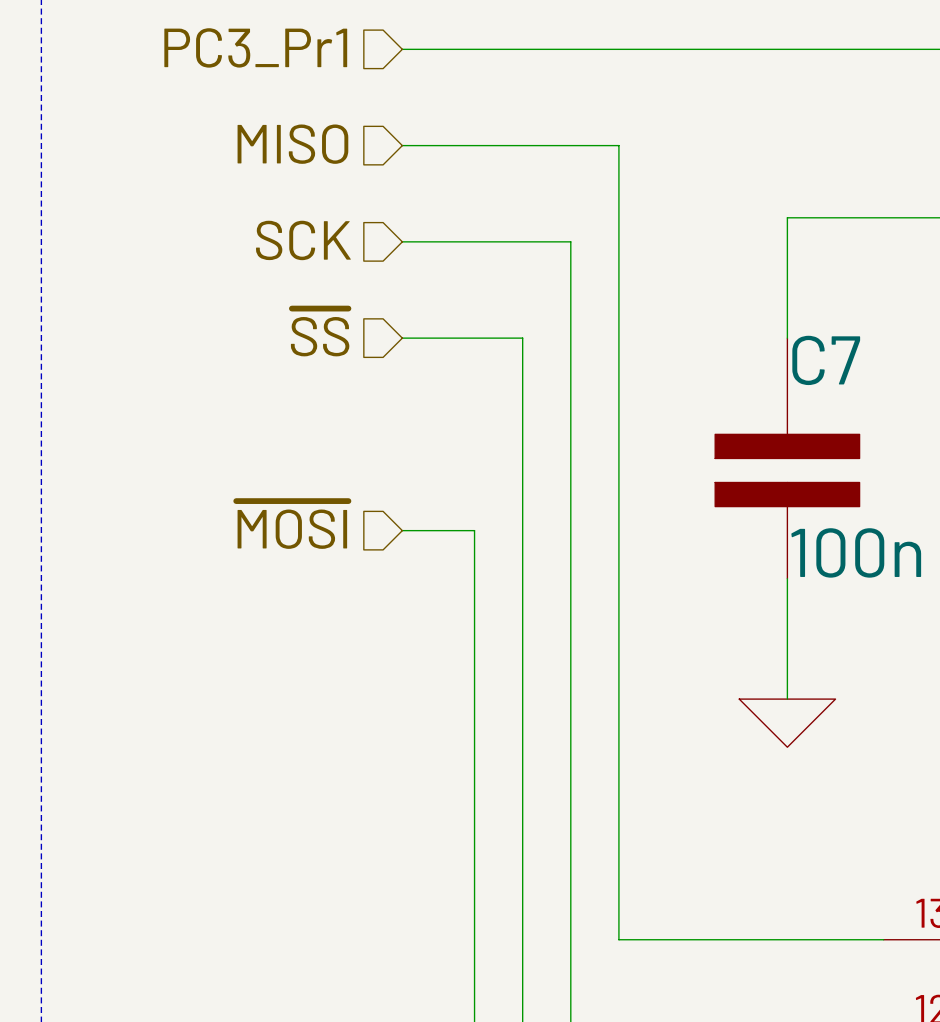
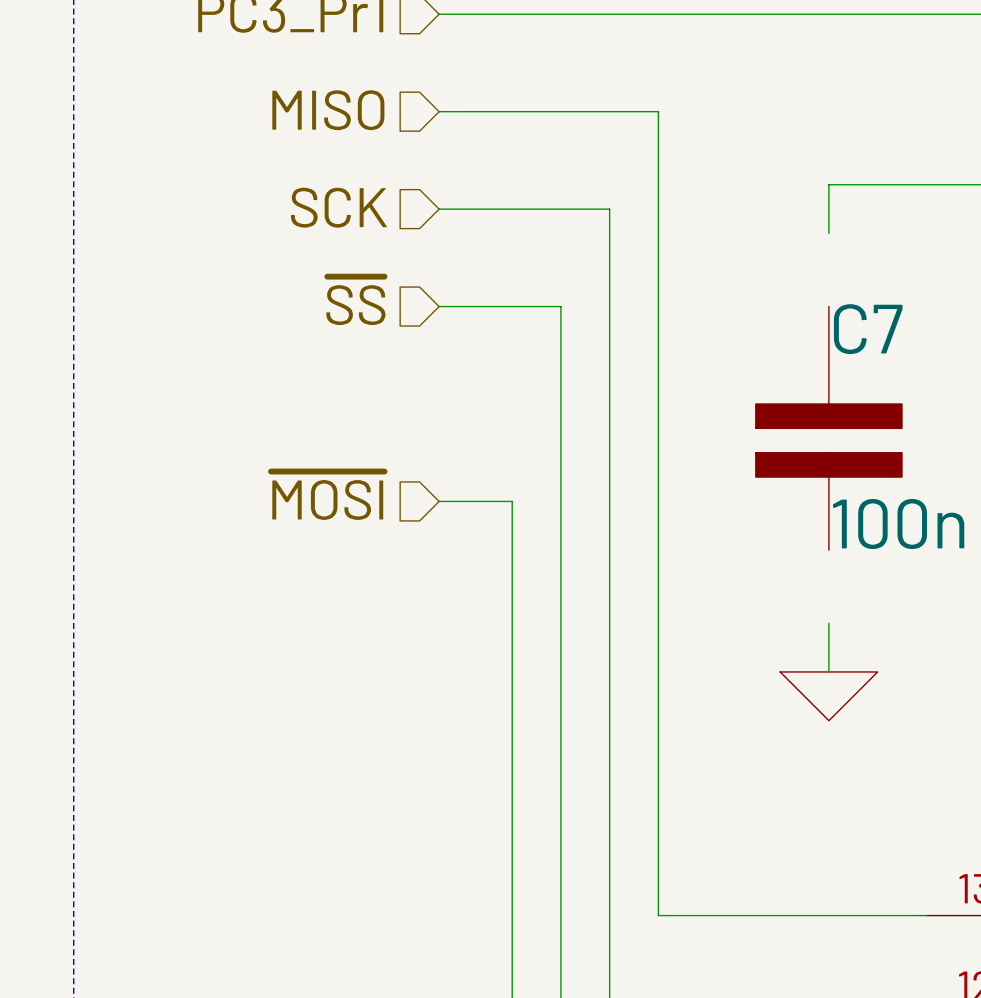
wire: (787, 265) (787, 338) -> none
wire: (787, 578) (787, 650) -> none

